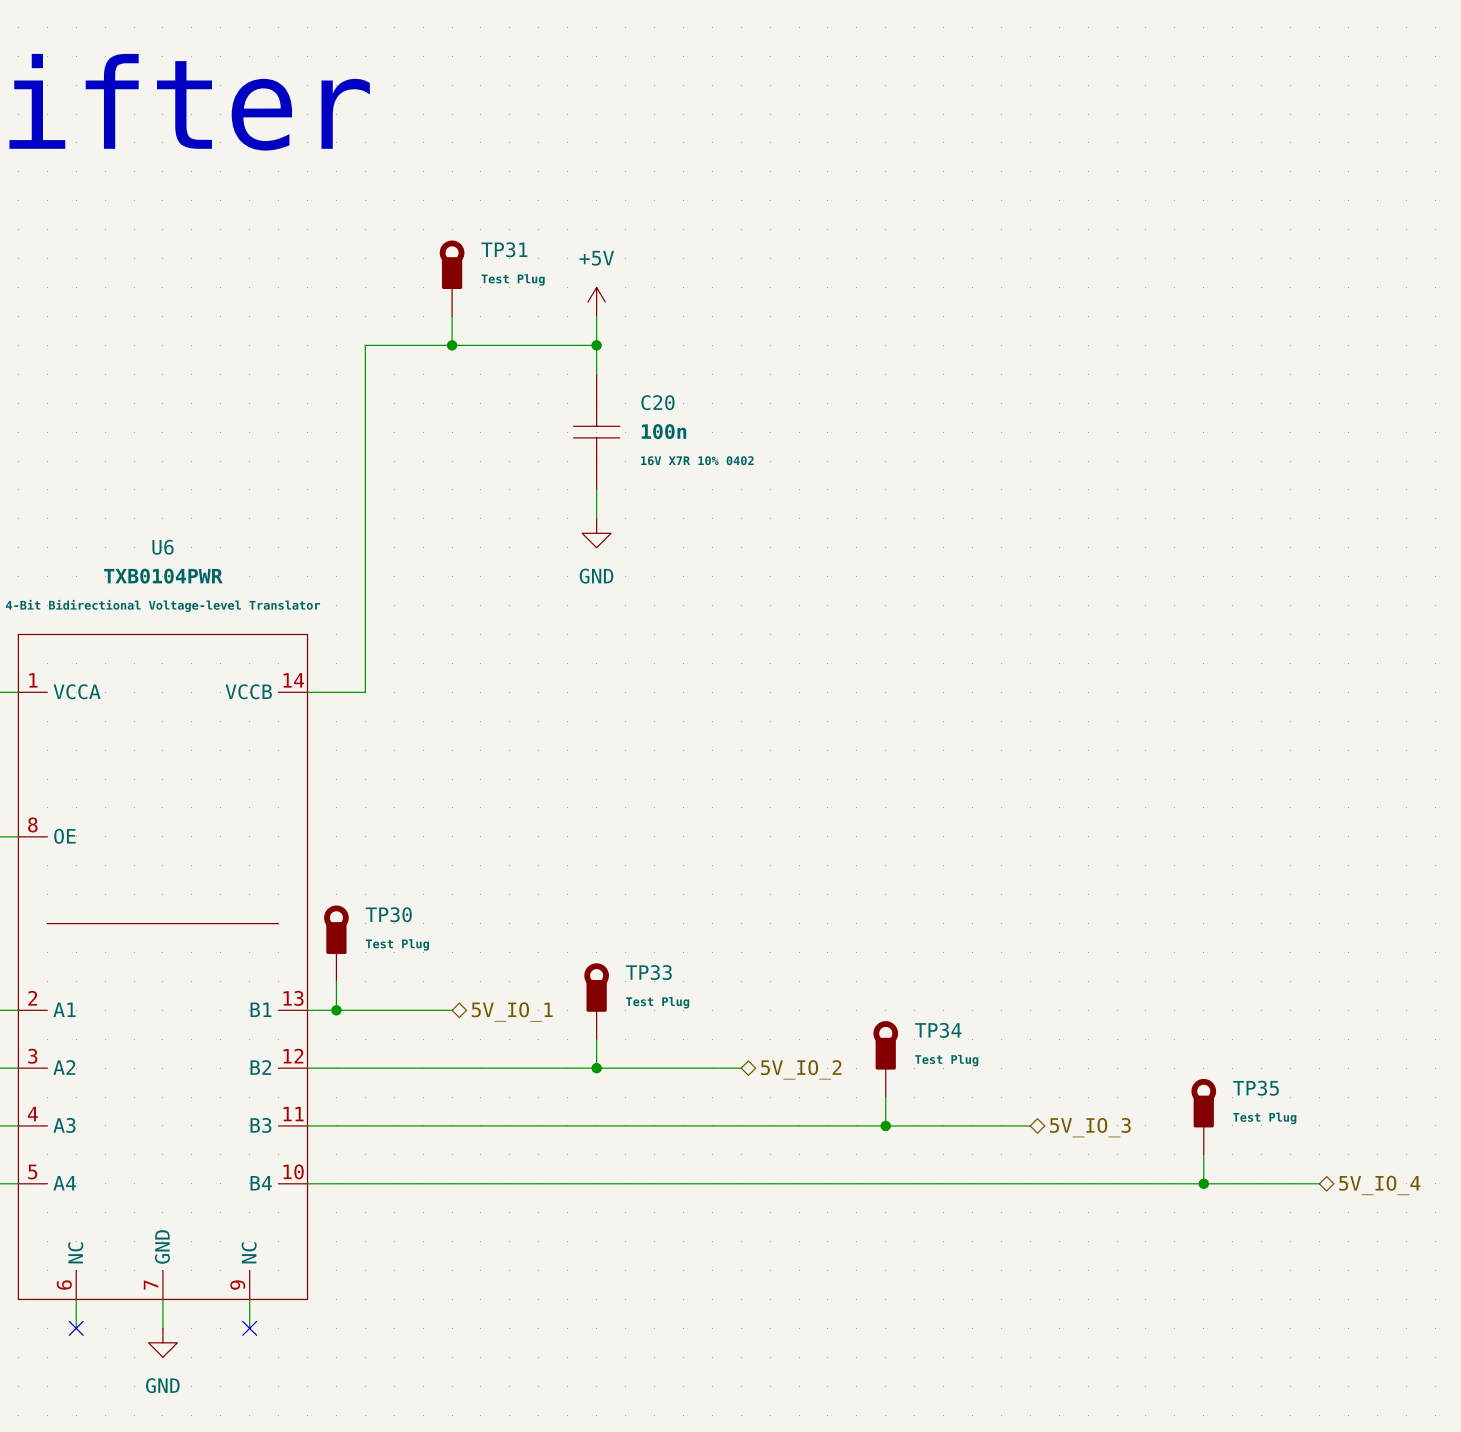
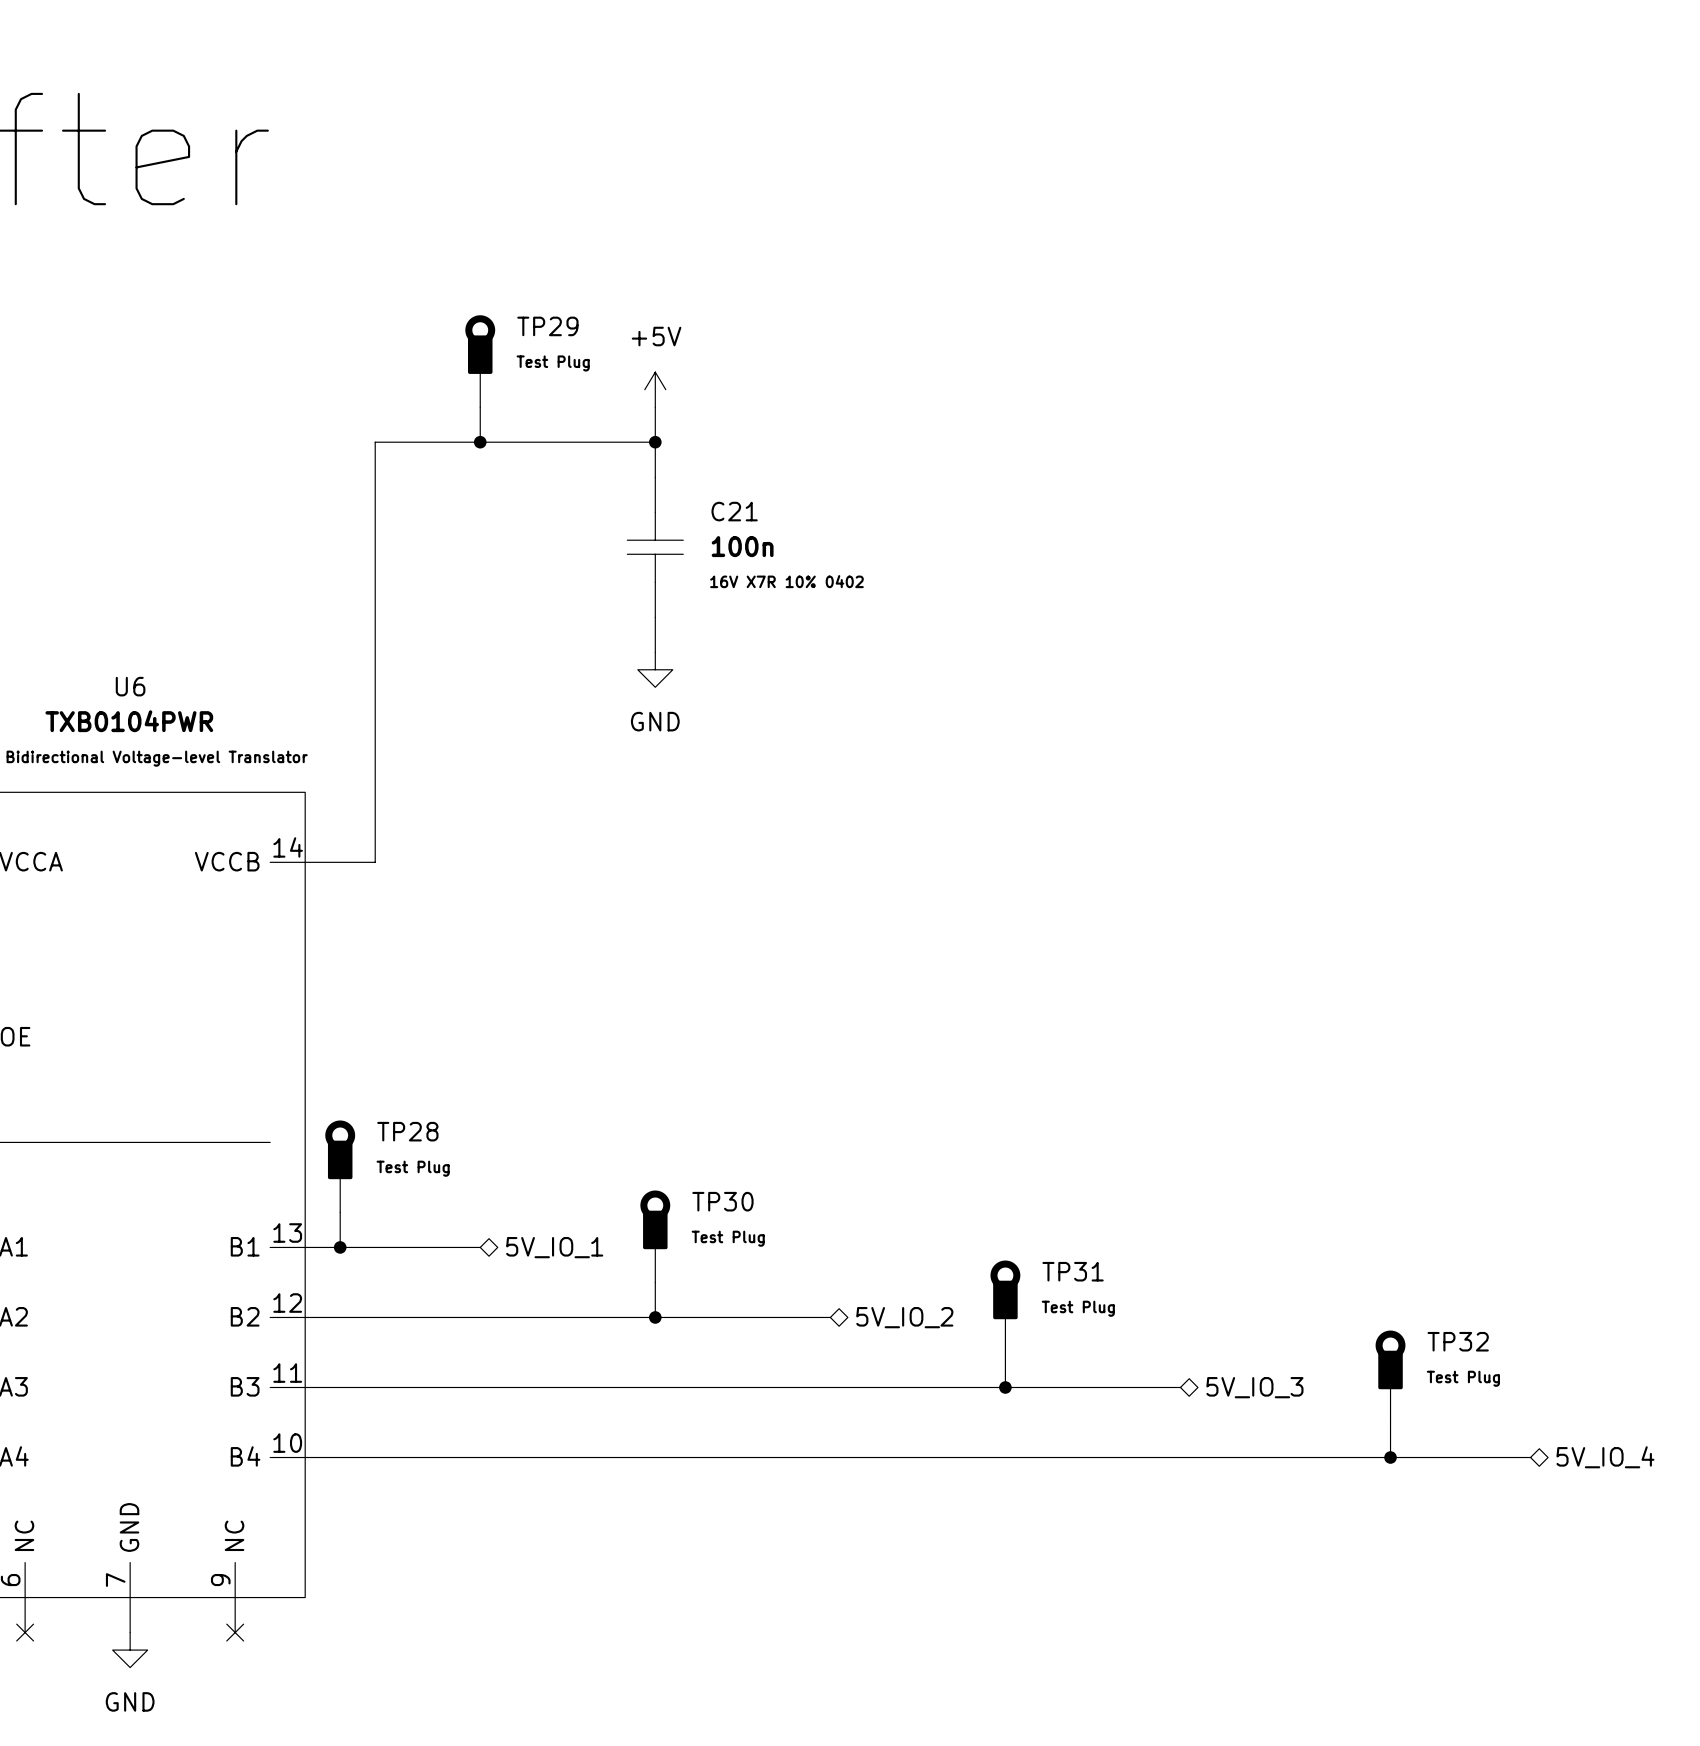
TP31 name: TP31 (504, 249) -> TP29 (547, 326)
C20 name: C20 (657, 402) -> C21 (734, 511)
TP30 name: TP30 (388, 914) -> TP28 (407, 1131)
TP33 name: TP33 (648, 972) -> TP30 (722, 1201)
TP34 name: TP34 (938, 1030) -> TP31 (1073, 1271)
TP35 name: TP35 (1255, 1088) -> TP32 (1458, 1341)

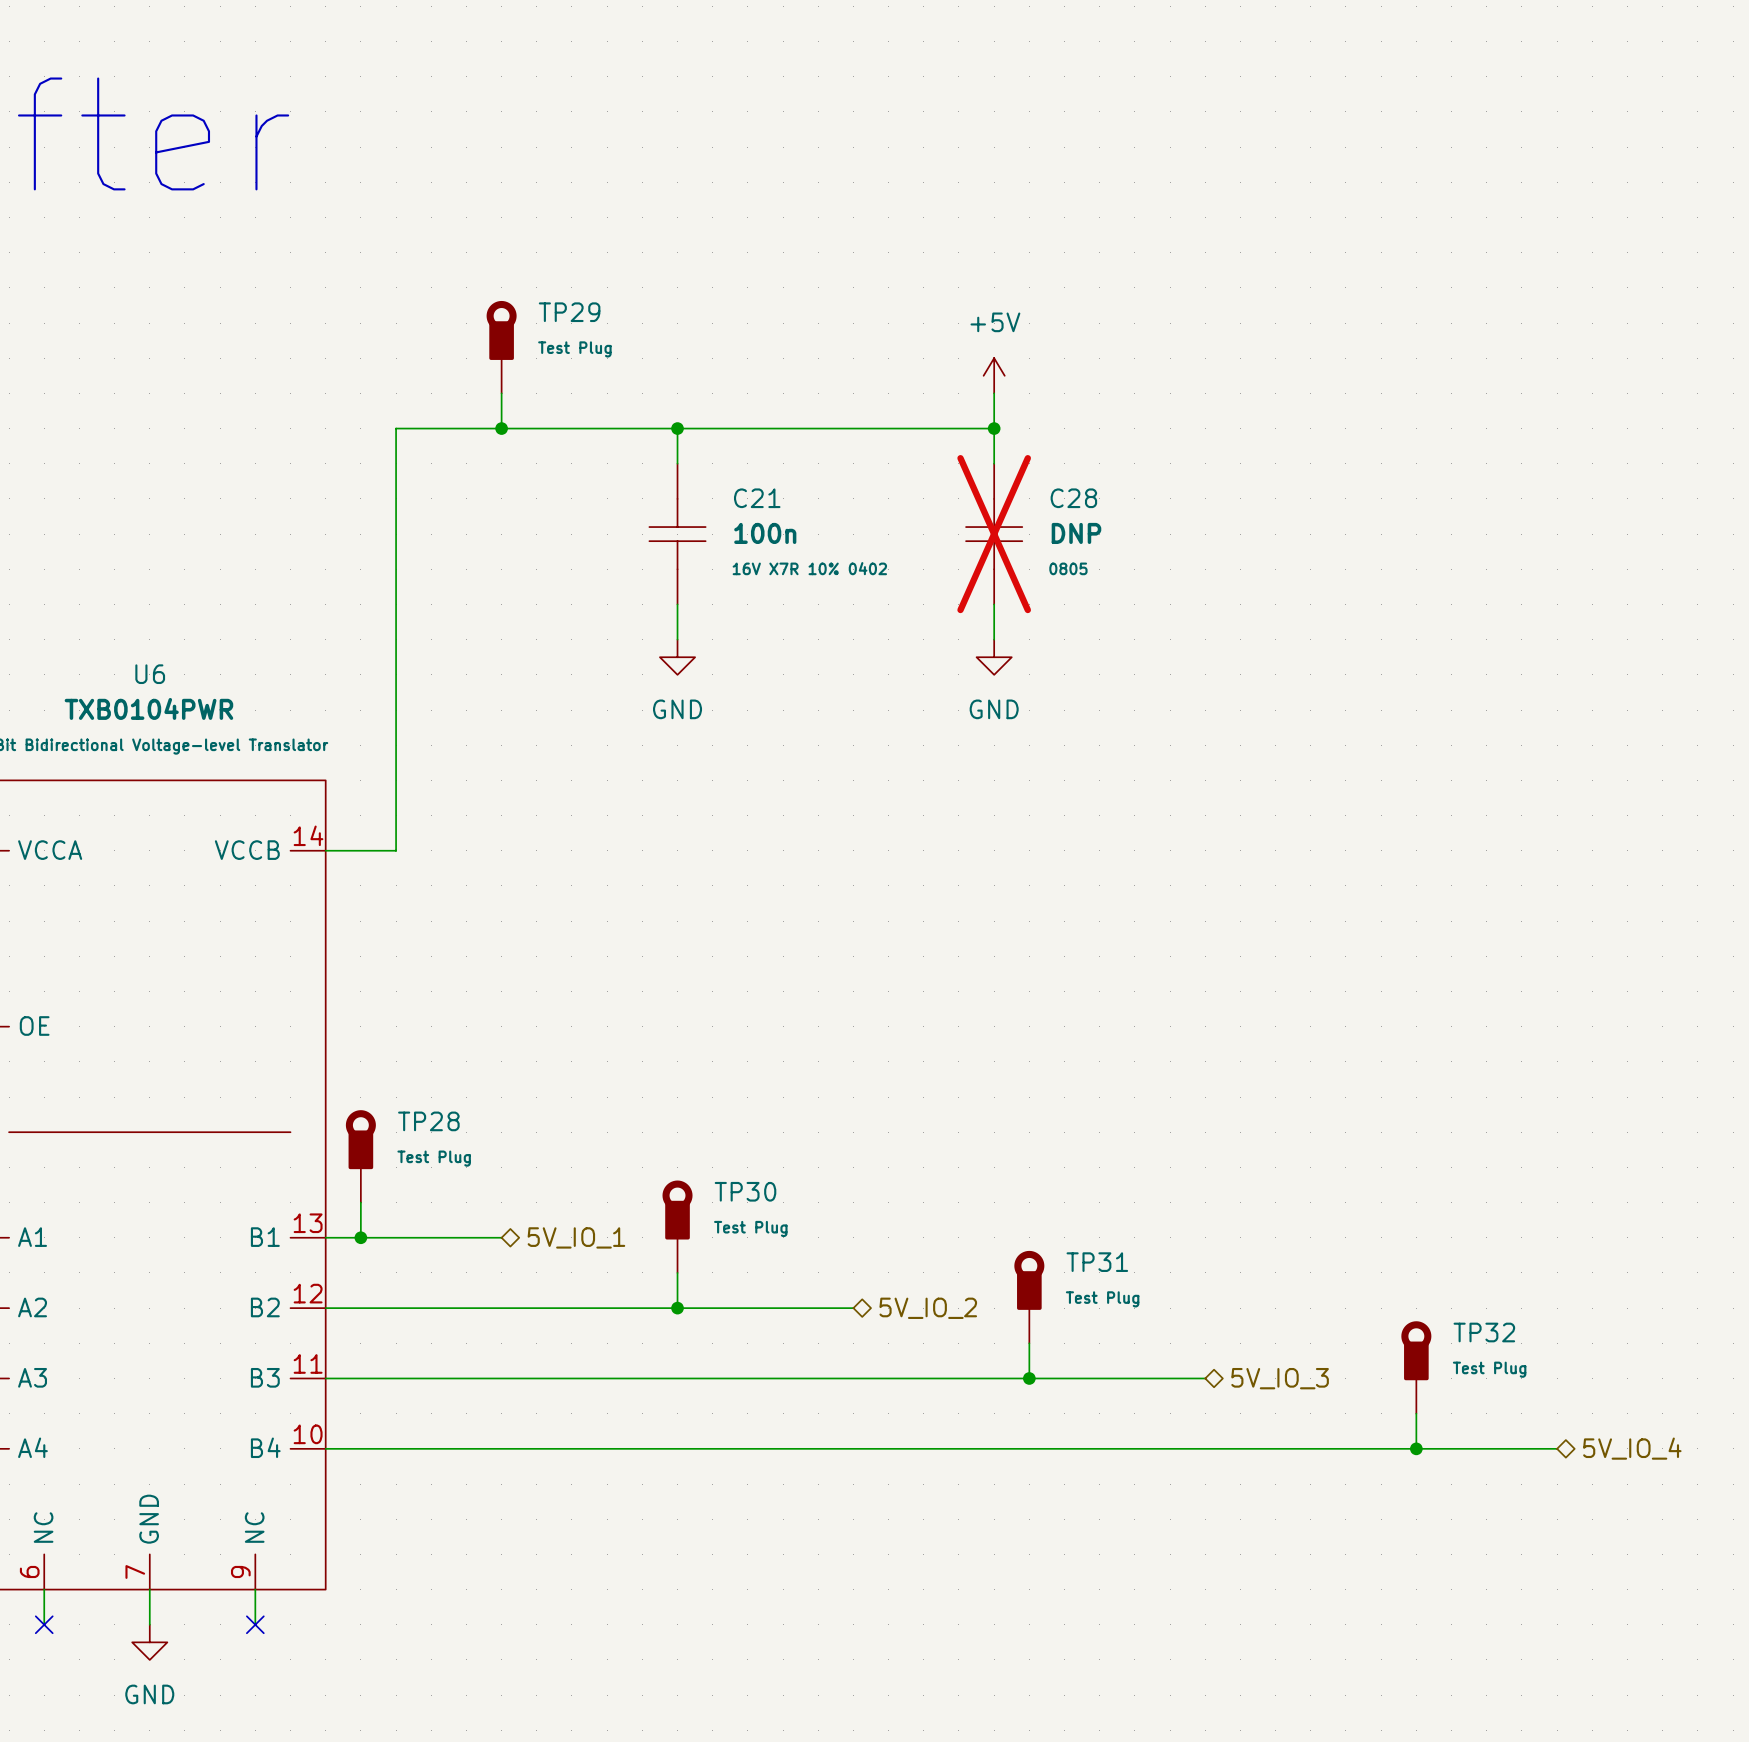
power symbol position: +5V (655, 389) -> +5V (994, 375)
wire: (655, 407) (655, 442) -> (994, 428) (677, 428)
wire: none -> (994, 393) (994, 463)
junction: none -> (994, 428)
C28: none -> DNP (994, 534)
wire: none -> (994, 604) (994, 639)
power symbol: none -> GND (994, 657)

